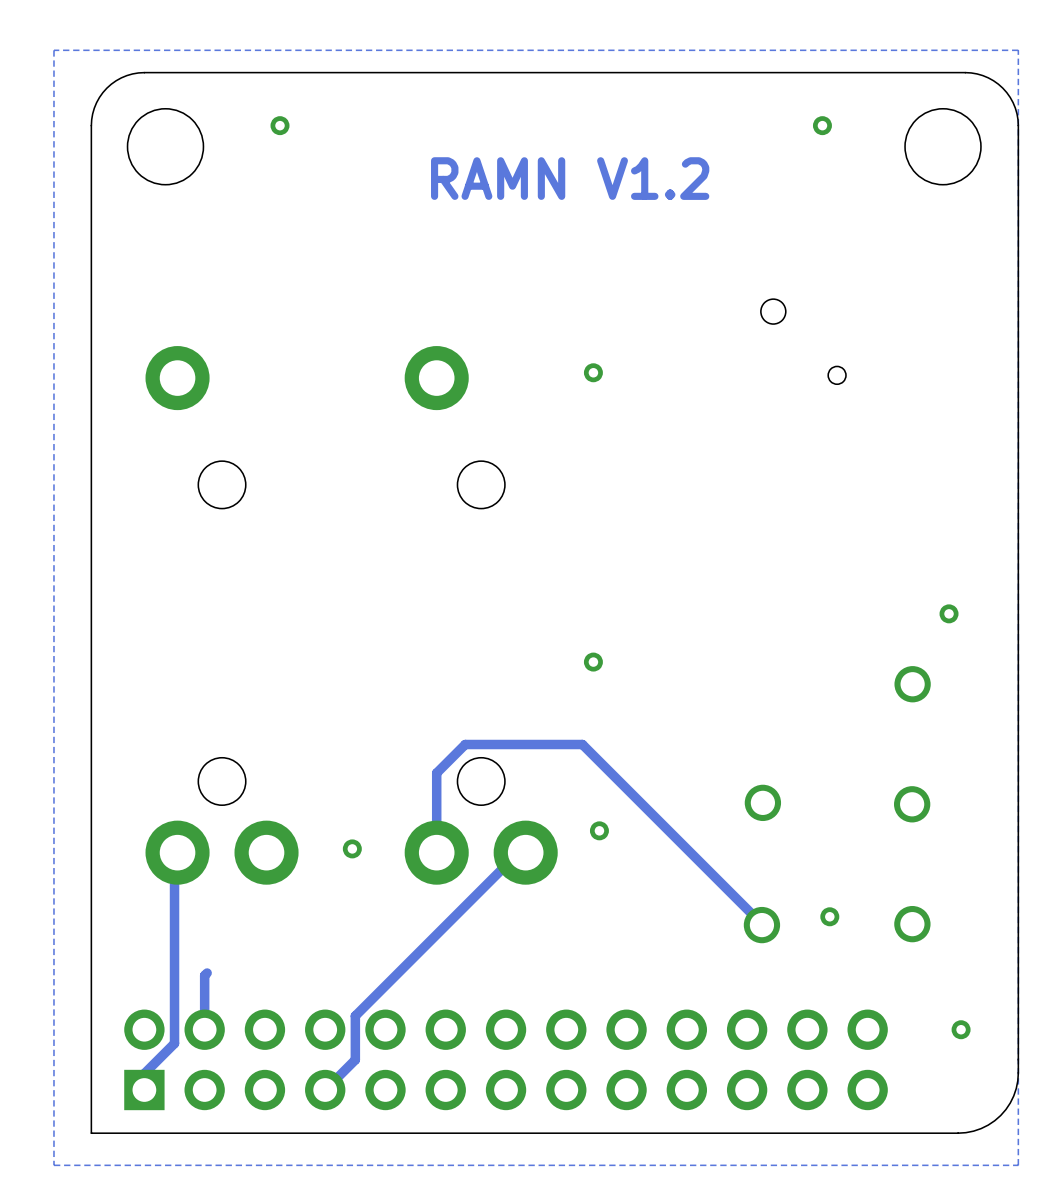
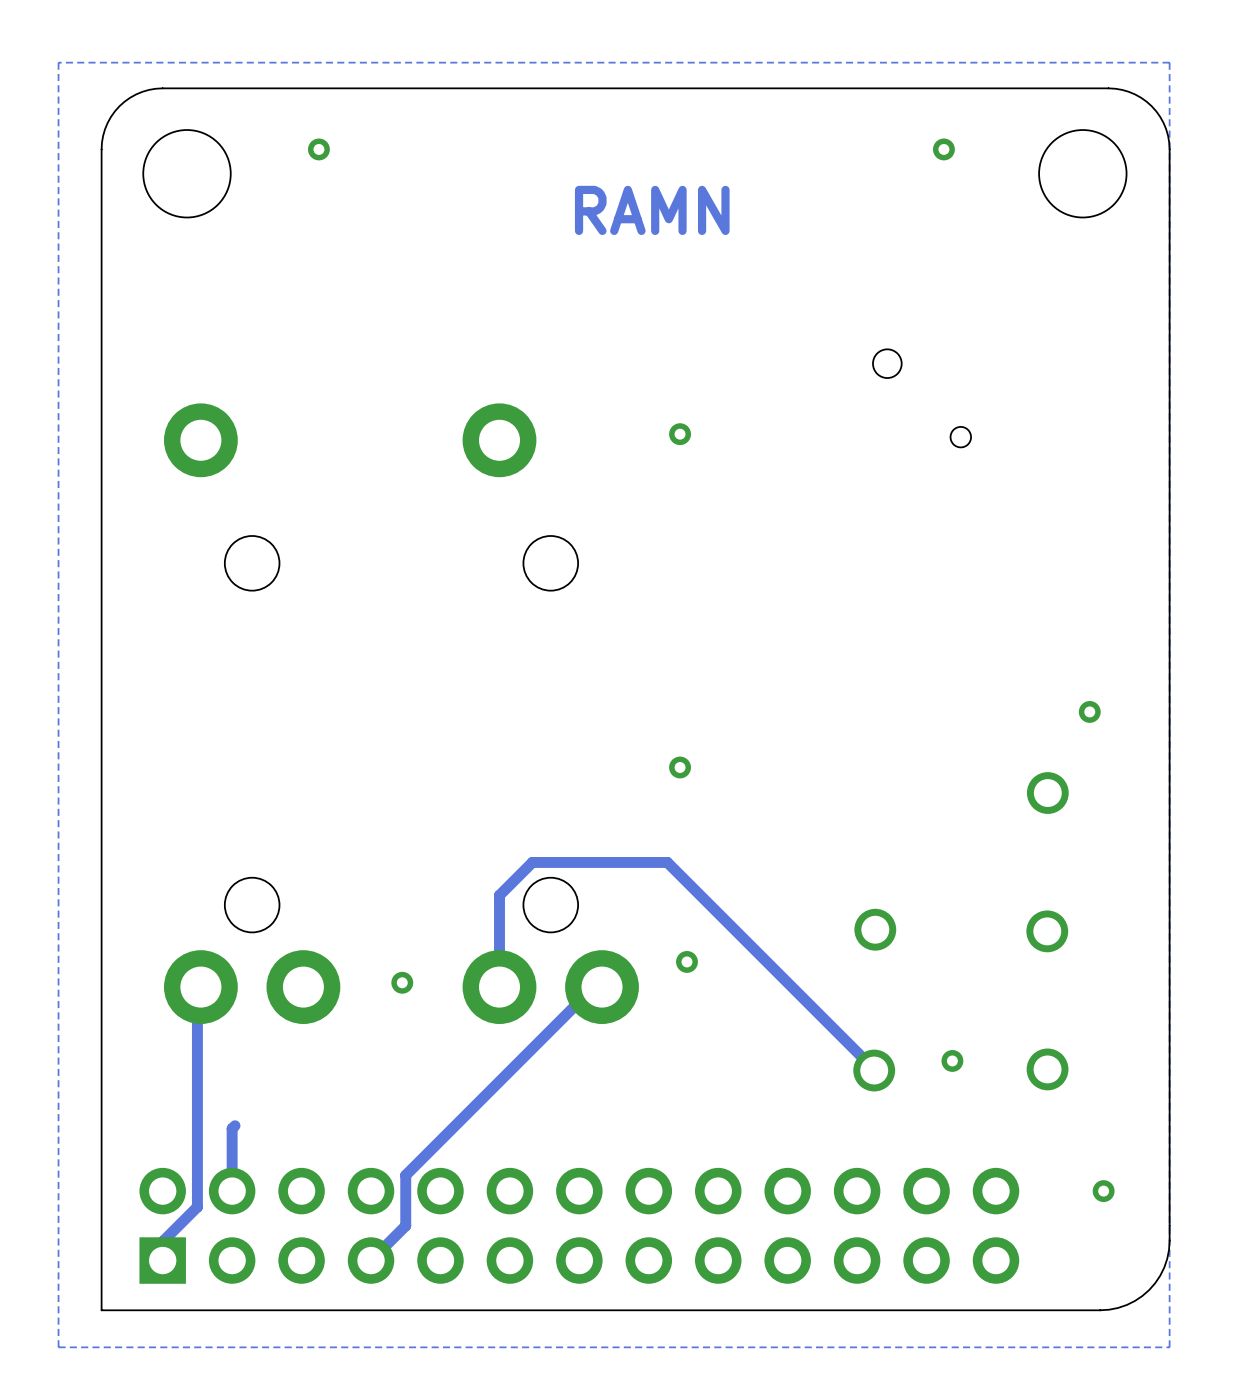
text: RAMN V1.2 (570, 178) -> RAMN (652, 210)

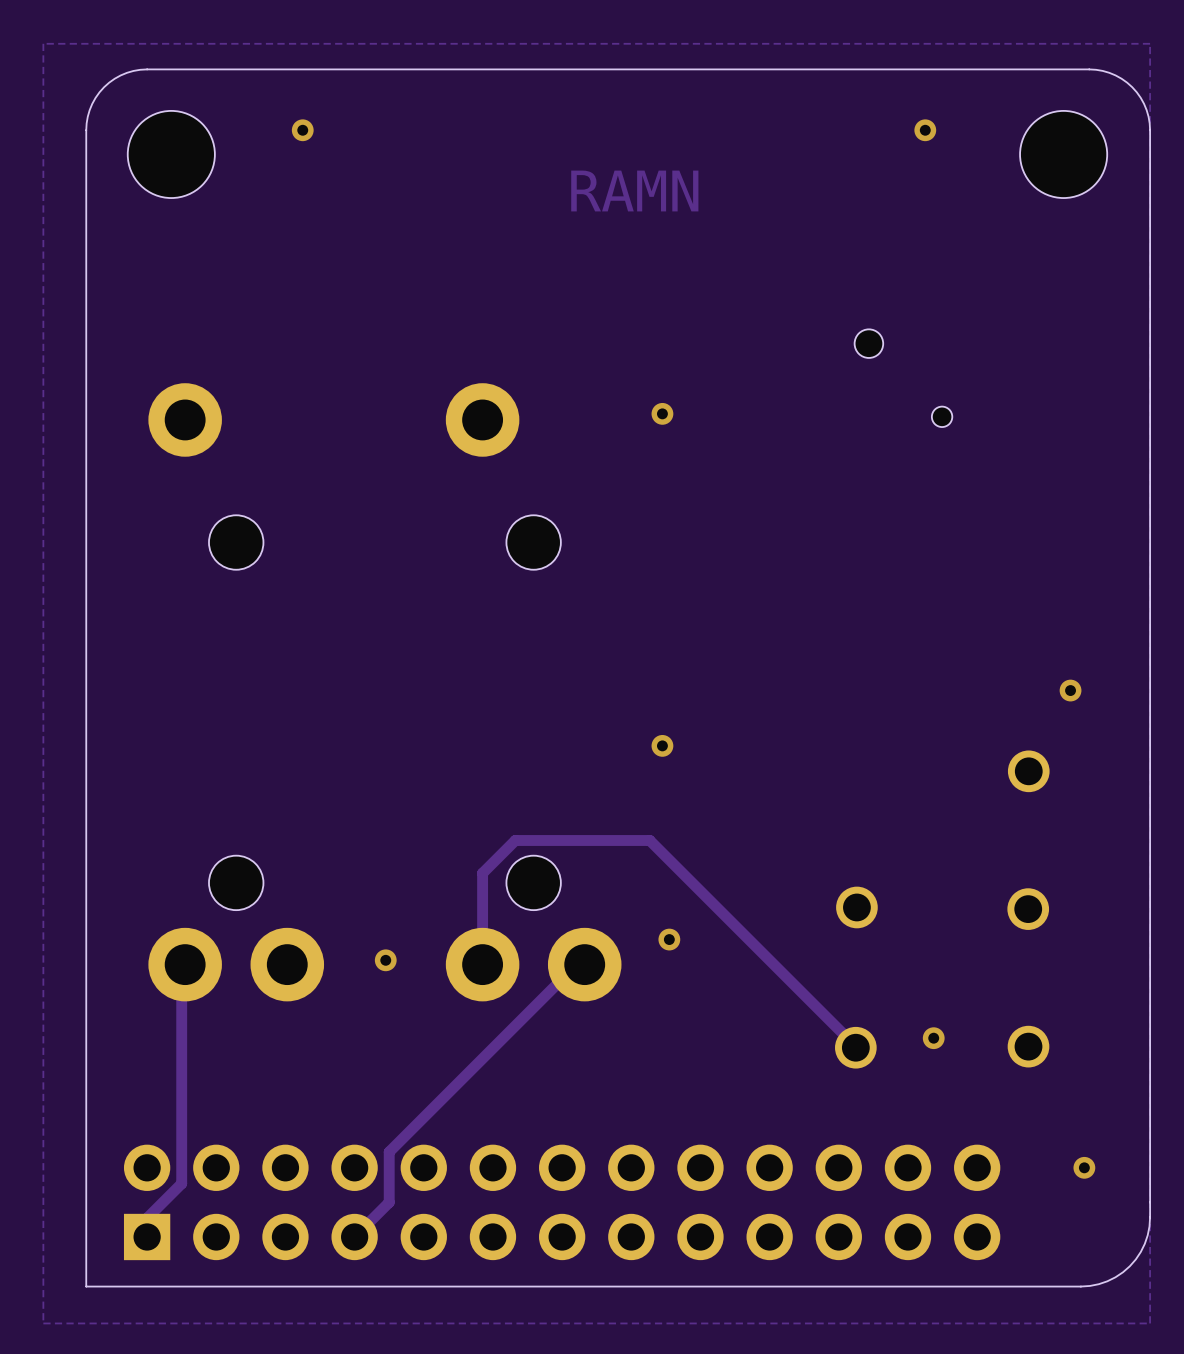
track: (235, 1125) (232, 1128) (232, 1191) -> none

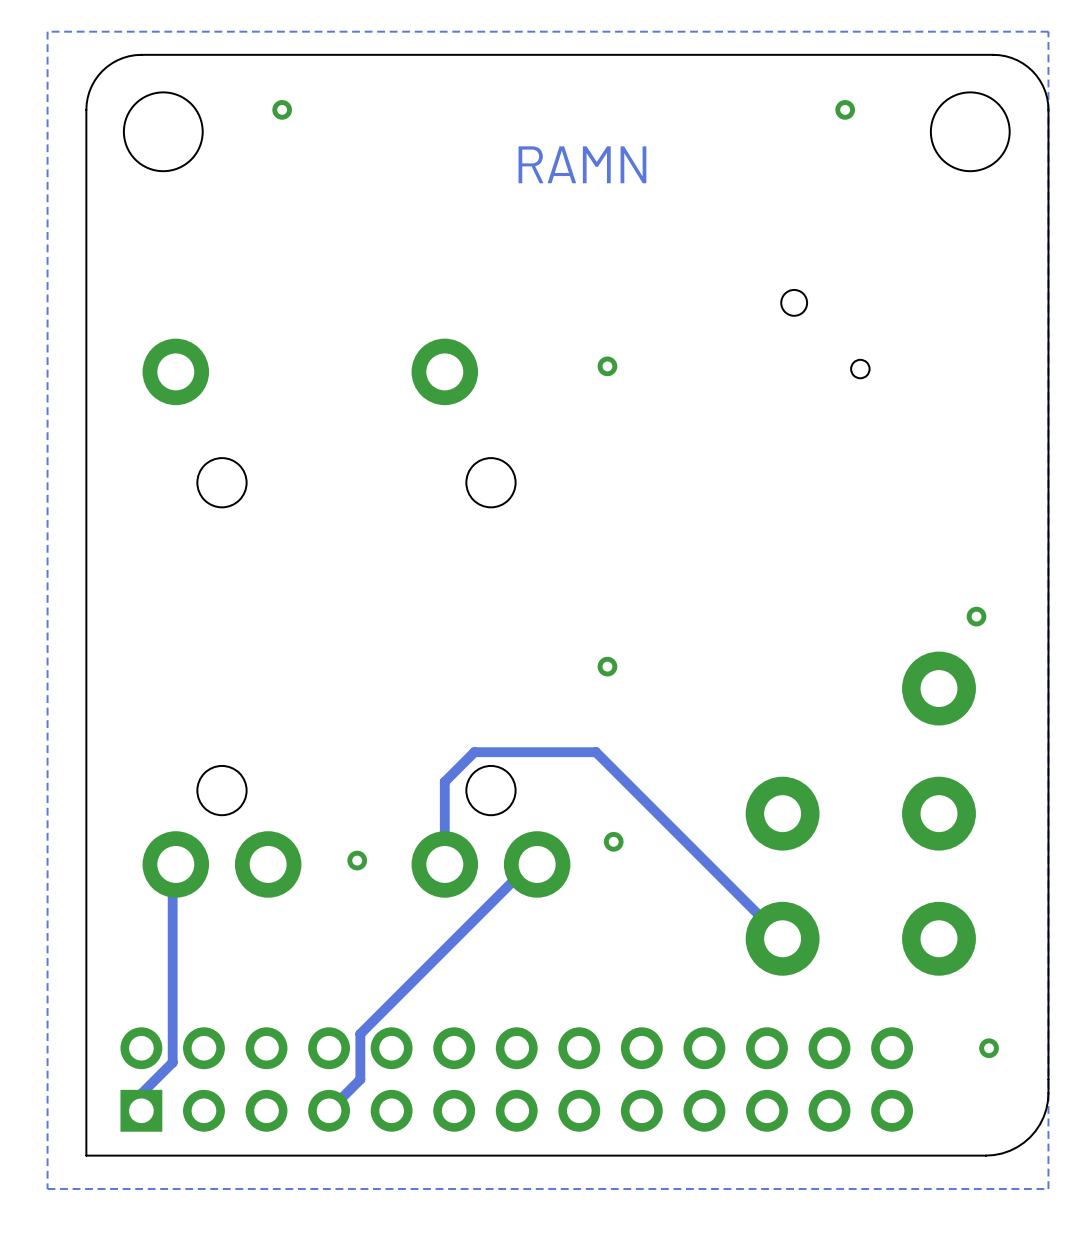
part footprint: [1007, 750, 1050, 793] -> [902, 651, 976, 726]
part footprint: [836, 886, 878, 929] -> [745, 776, 820, 851]
part footprint: [1007, 888, 1050, 930] -> [902, 776, 976, 851]
part footprint: [1007, 1025, 1050, 1068] -> [902, 901, 976, 976]
part footprint: [835, 1026, 877, 1069] -> [745, 901, 820, 976]
via: (933, 1038) -> none

